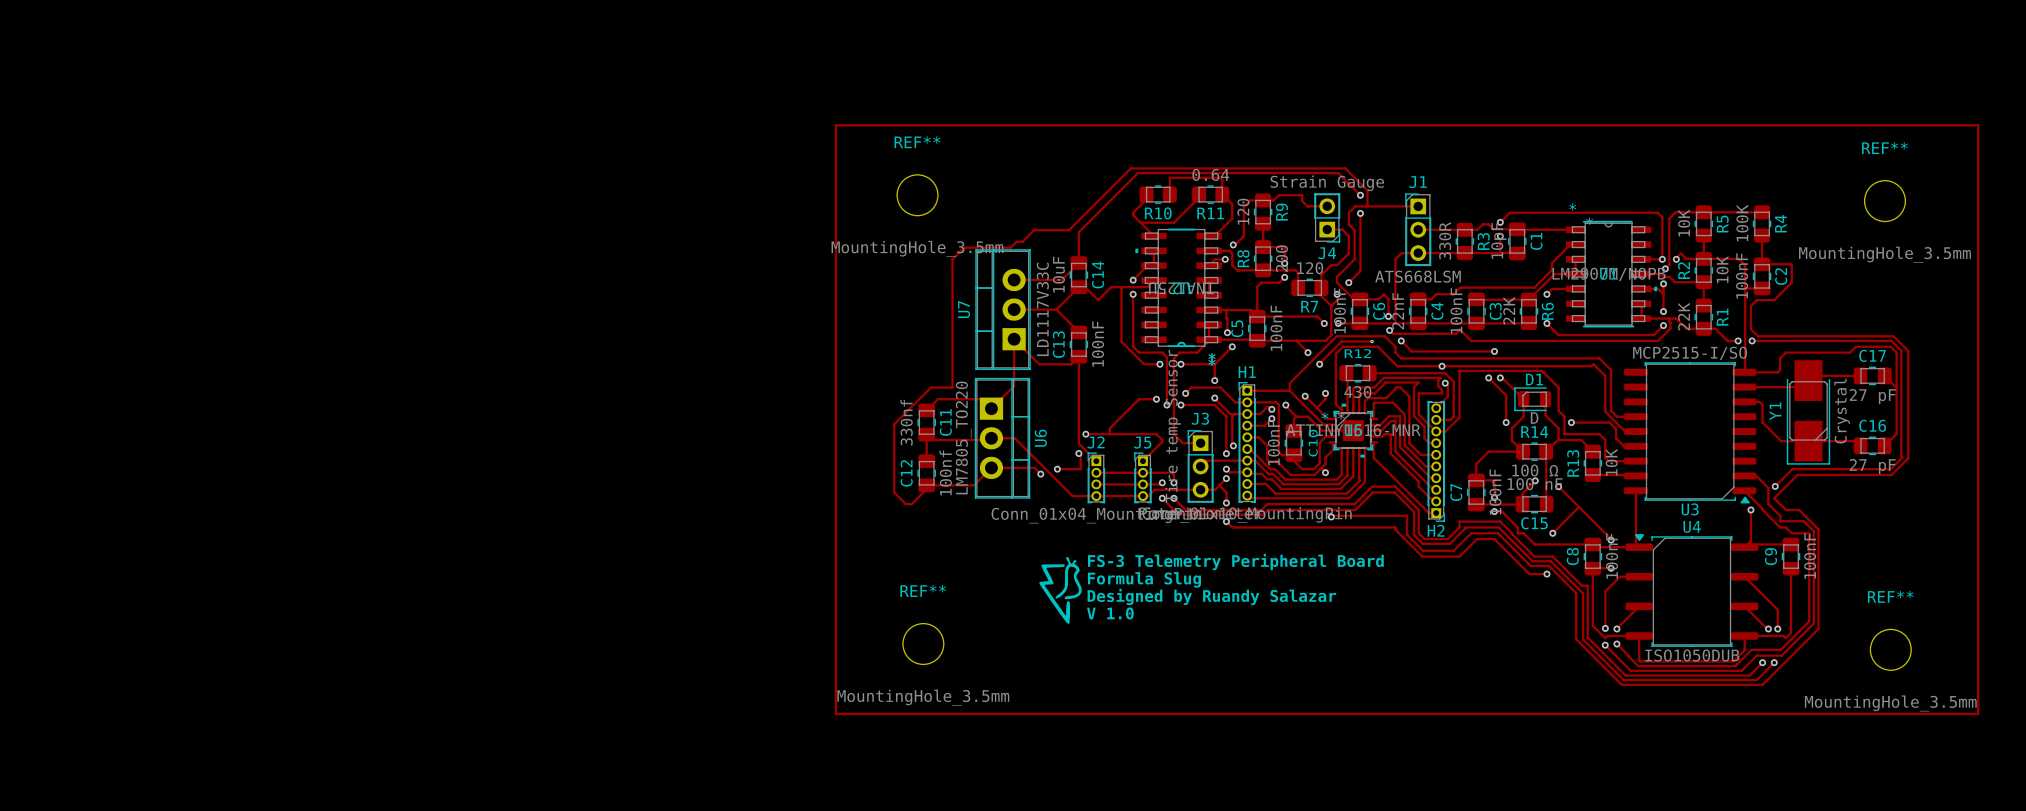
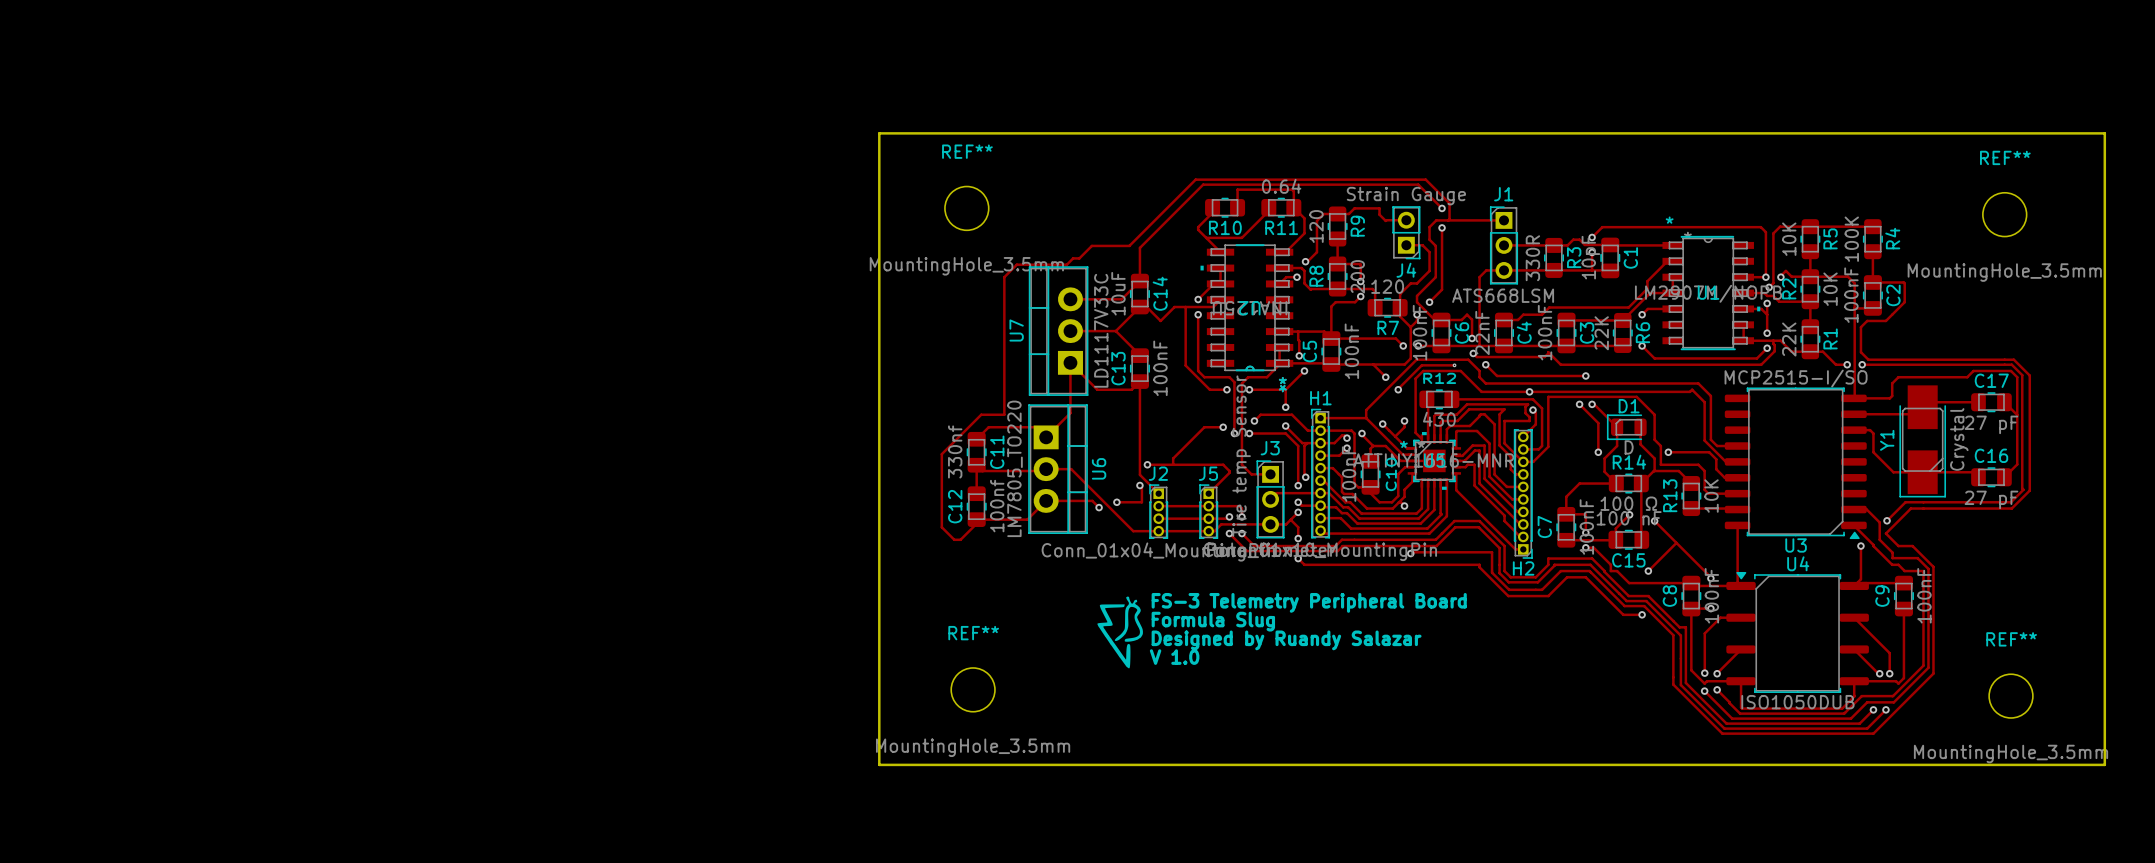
track: (835, 125) (1978, 125) (1978, 713) (835, 713) (835, 125) -> none
board edge: none -> (879, 133) (2104, 133) (2104, 764) (879, 764) (879, 133)

